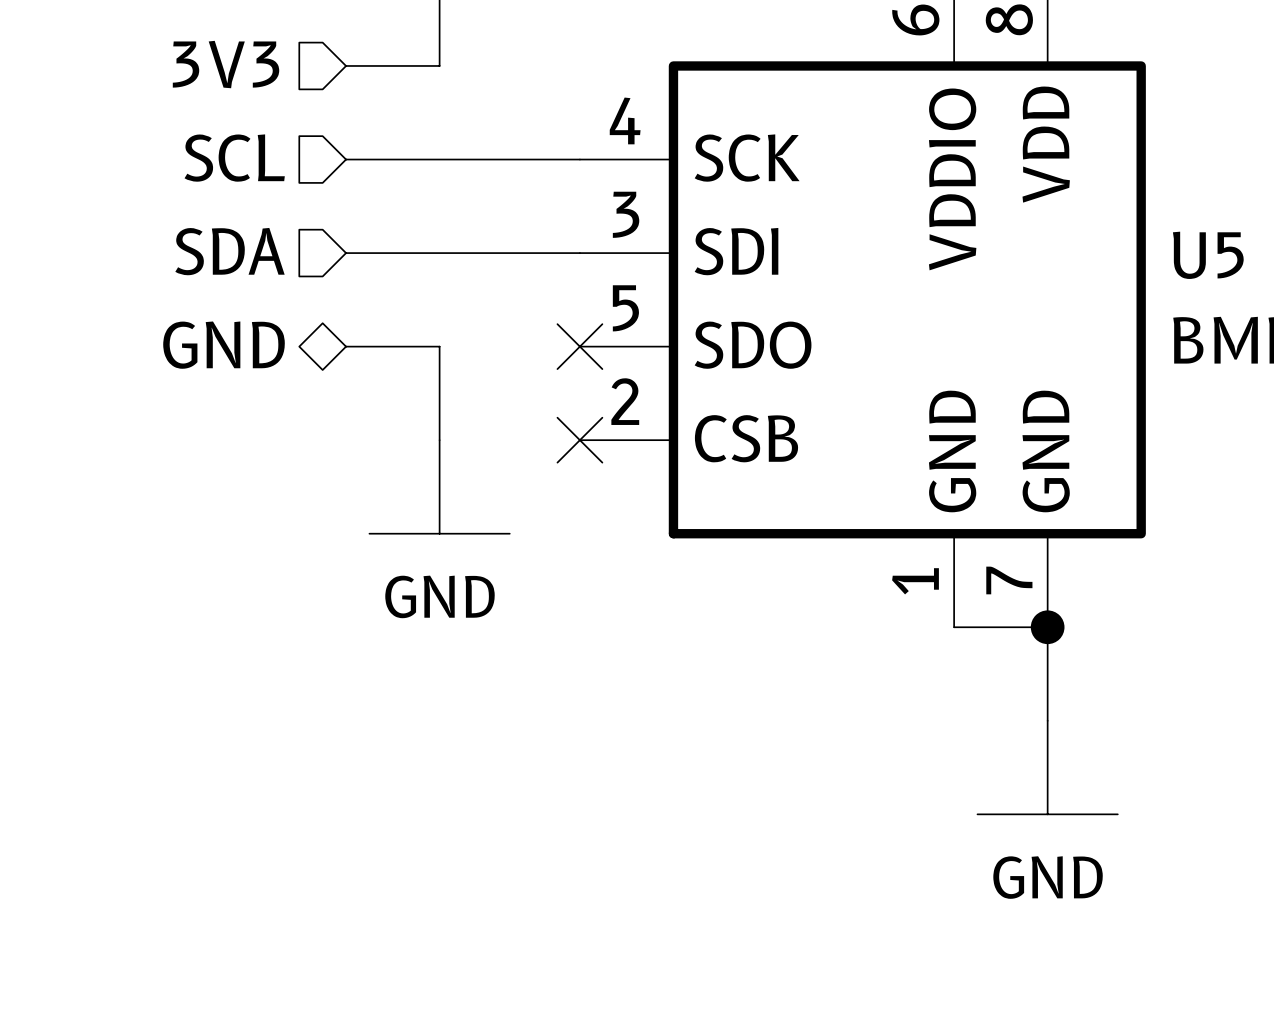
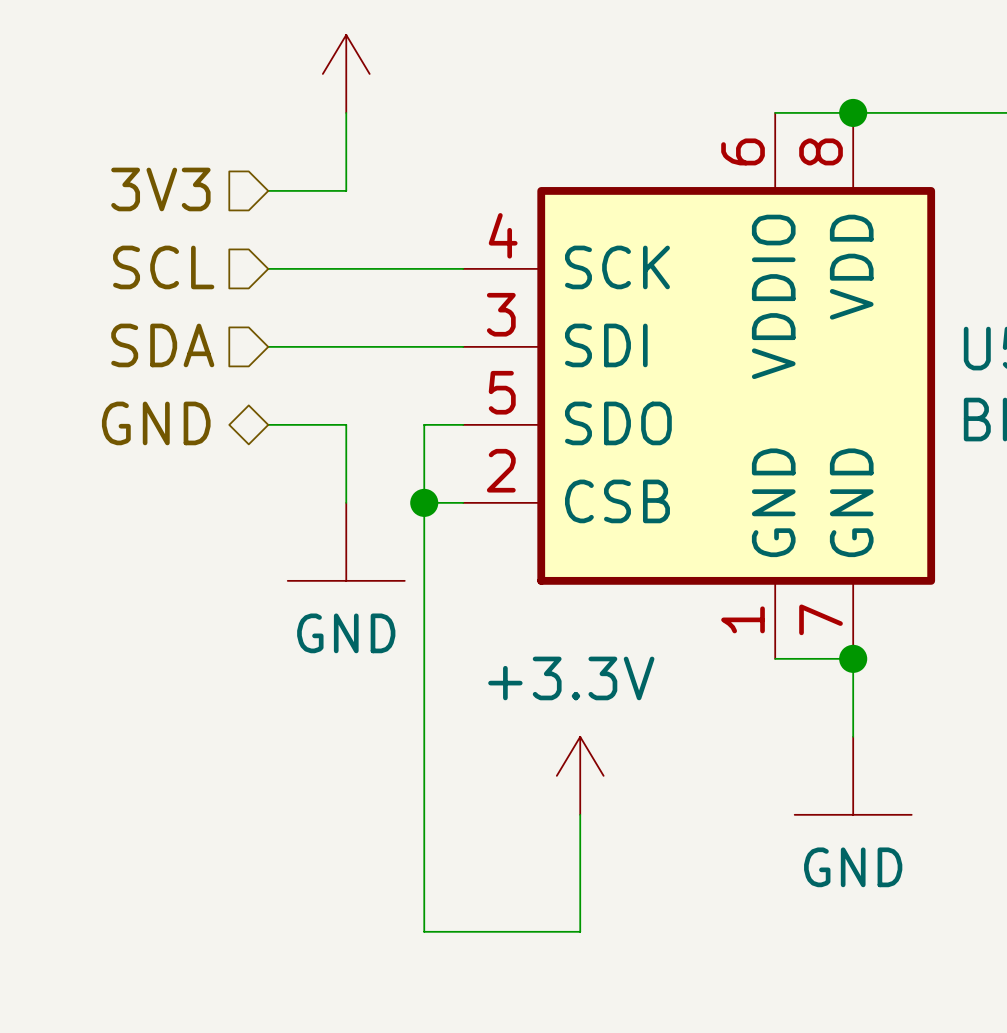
wire: none -> (463, 424) (424, 424) (424, 931) (580, 931) (580, 814)
no-connect mark: (579, 346) -> none
wire: none -> (424, 502) (463, 502)
junction: none -> (424, 502)
no-connect mark: (579, 440) -> none
power symbol: none -> +3.3V (580, 775)

